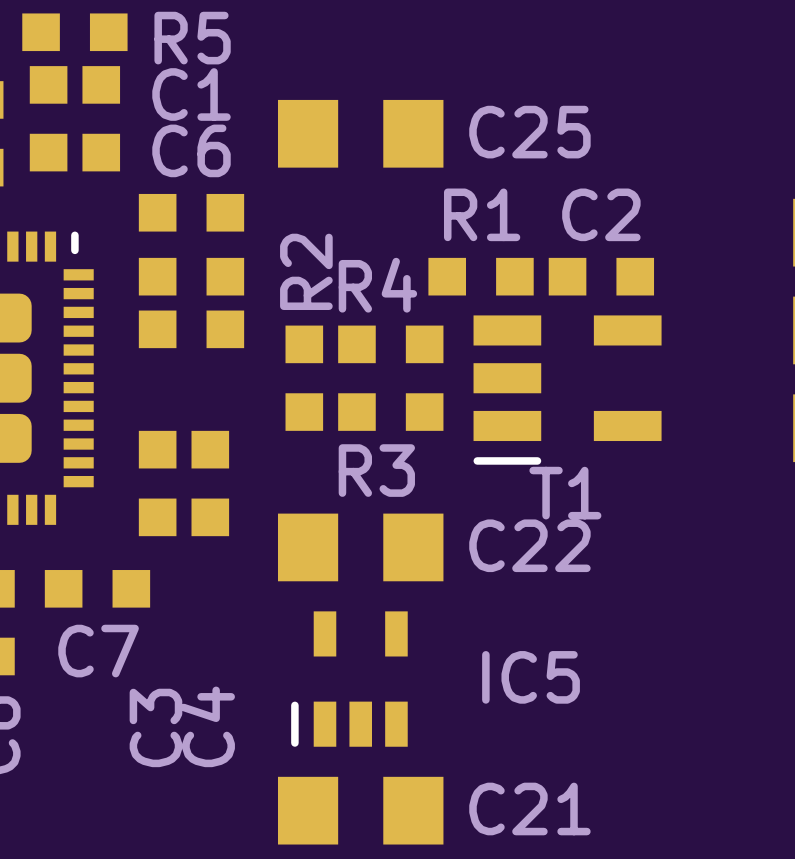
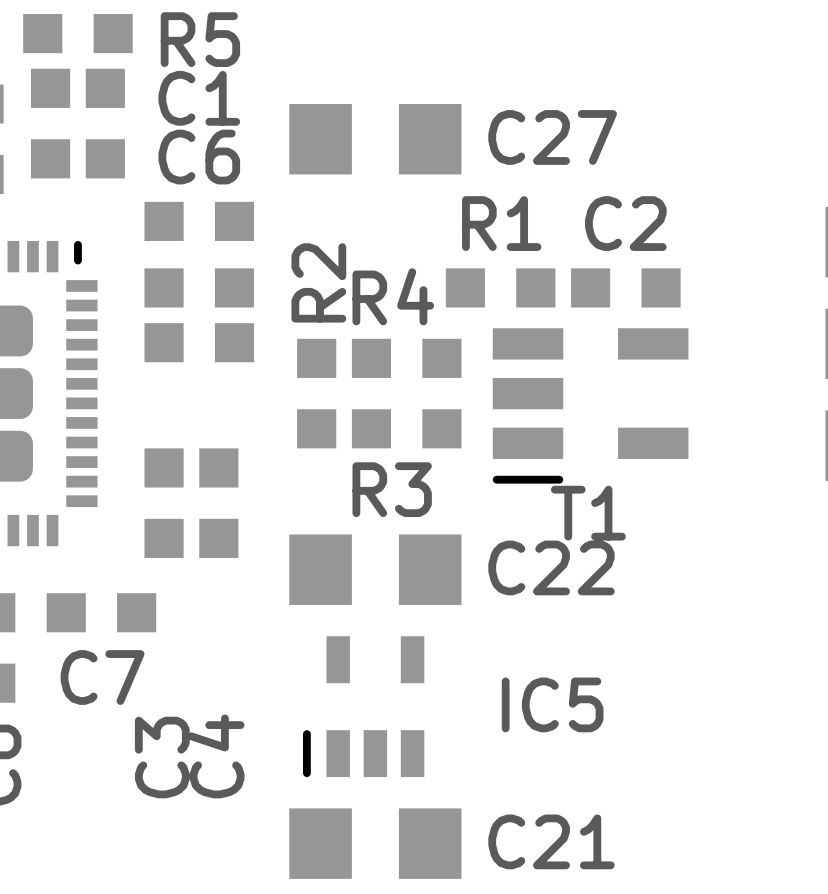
C25 name: C25 (529, 132) -> C27 (552, 137)

